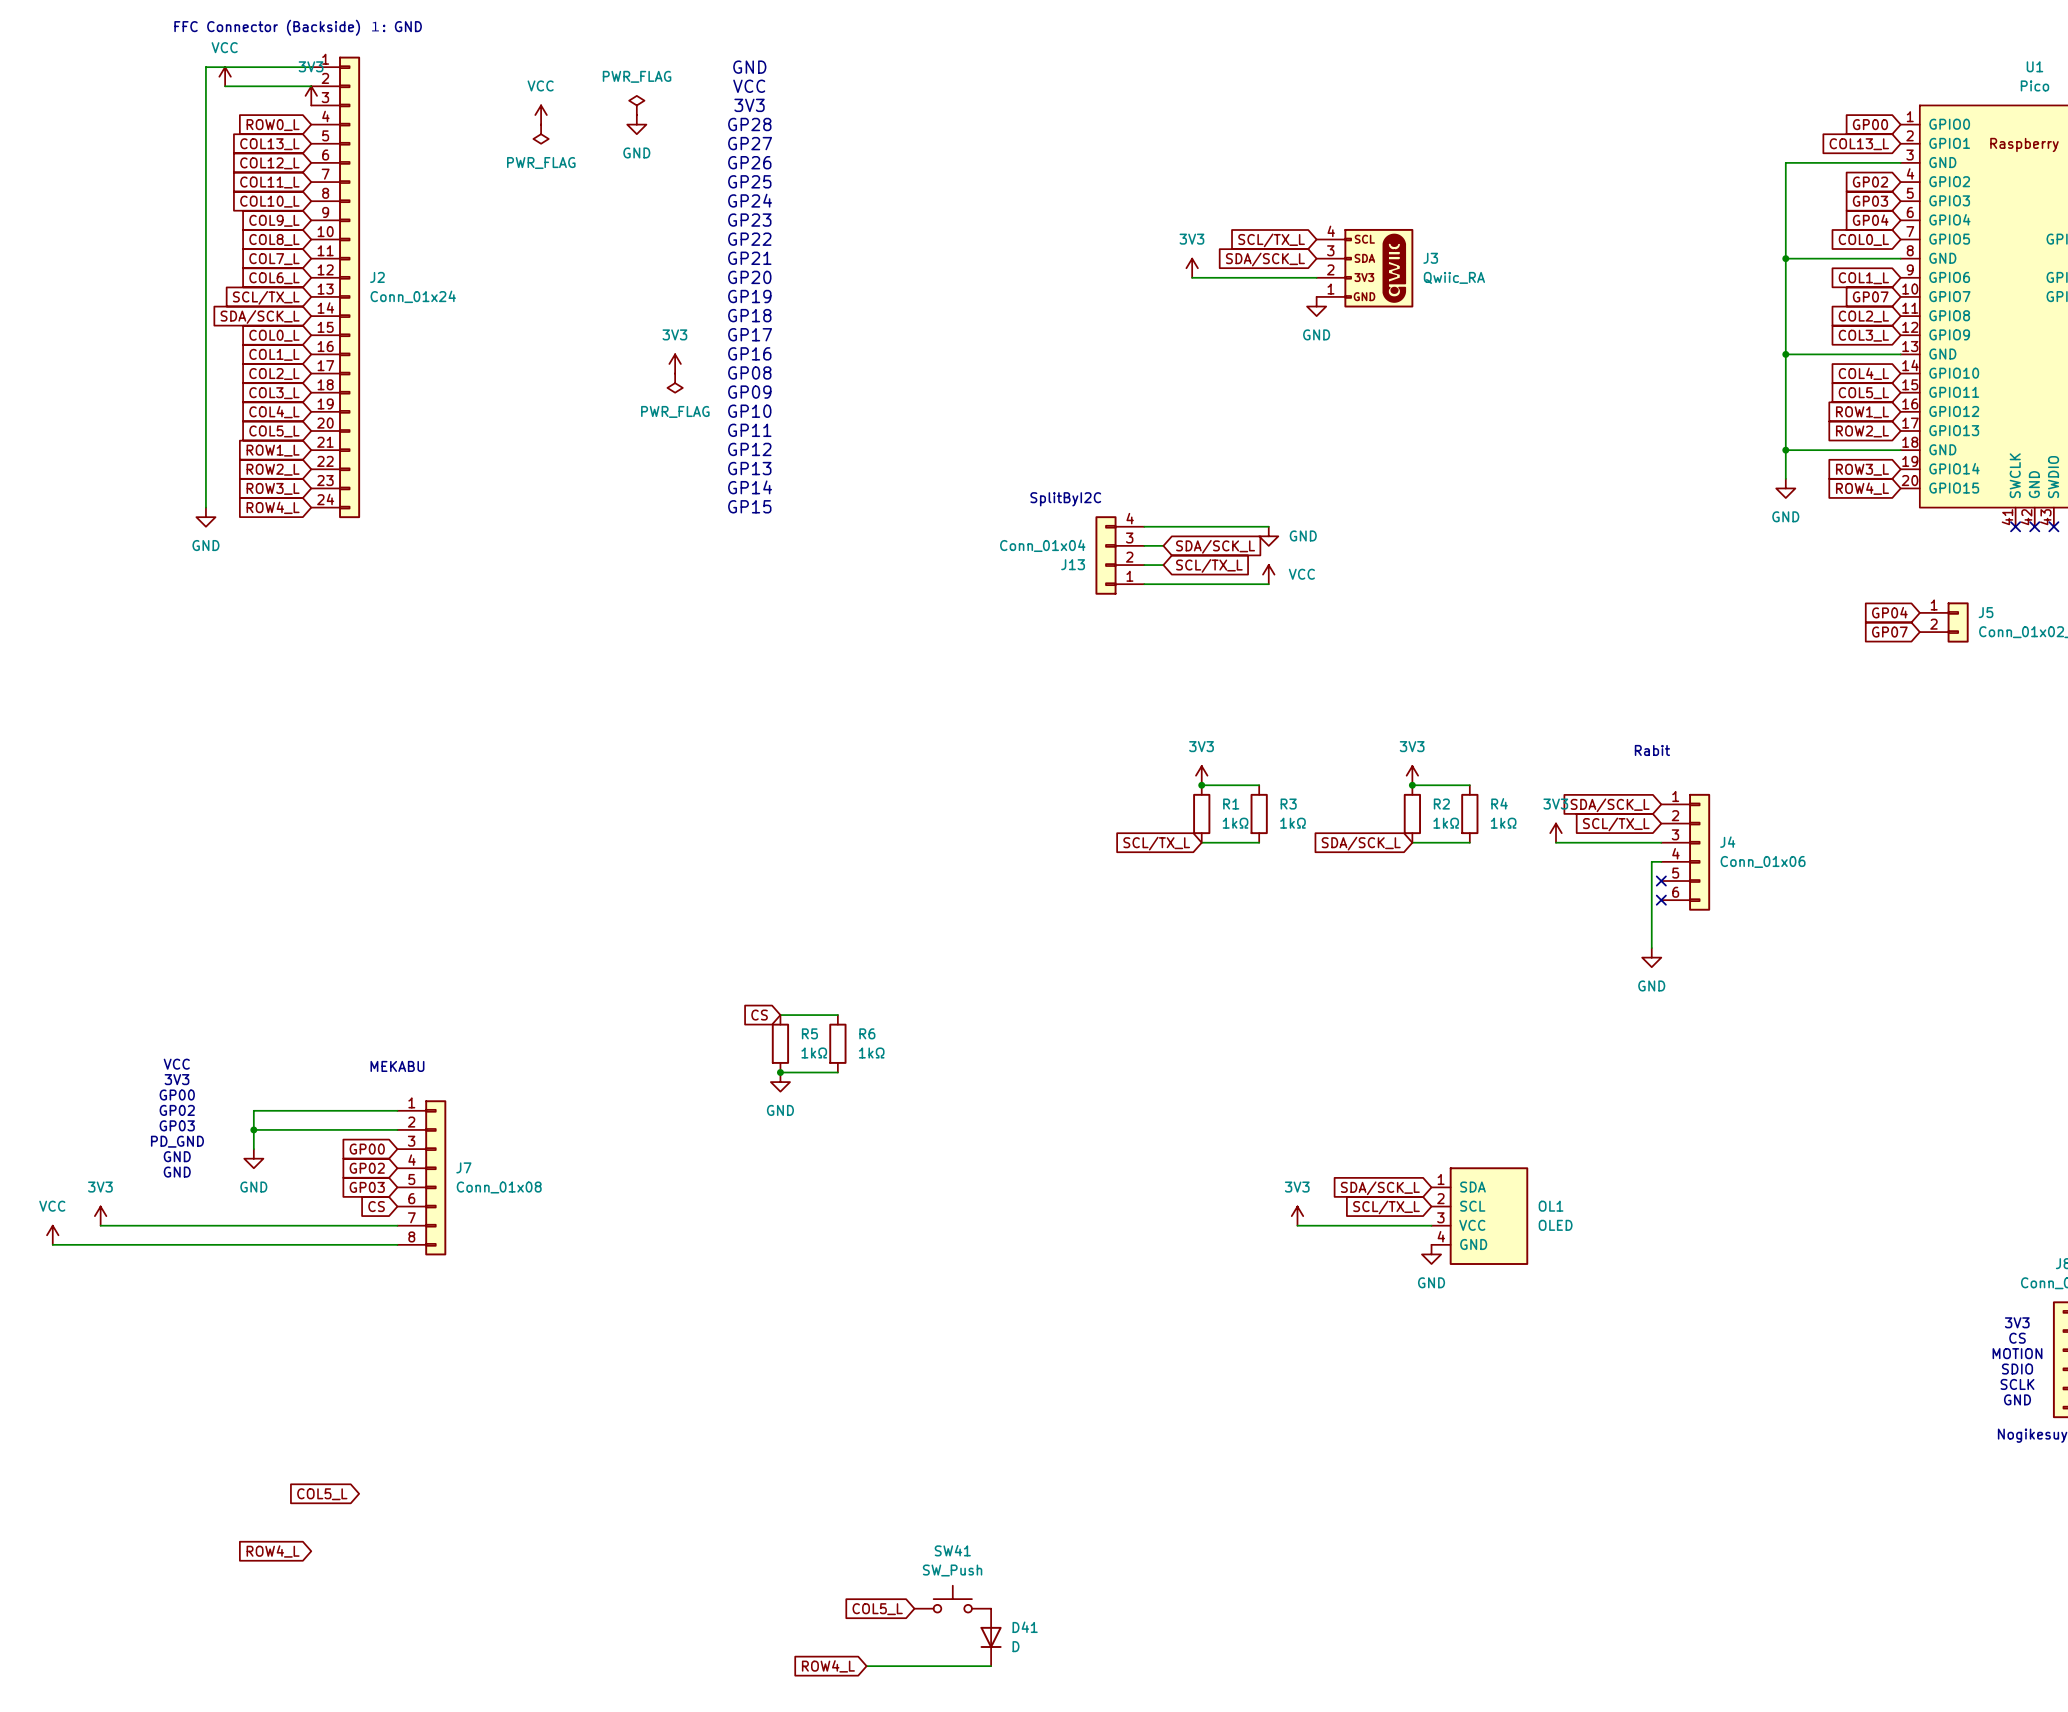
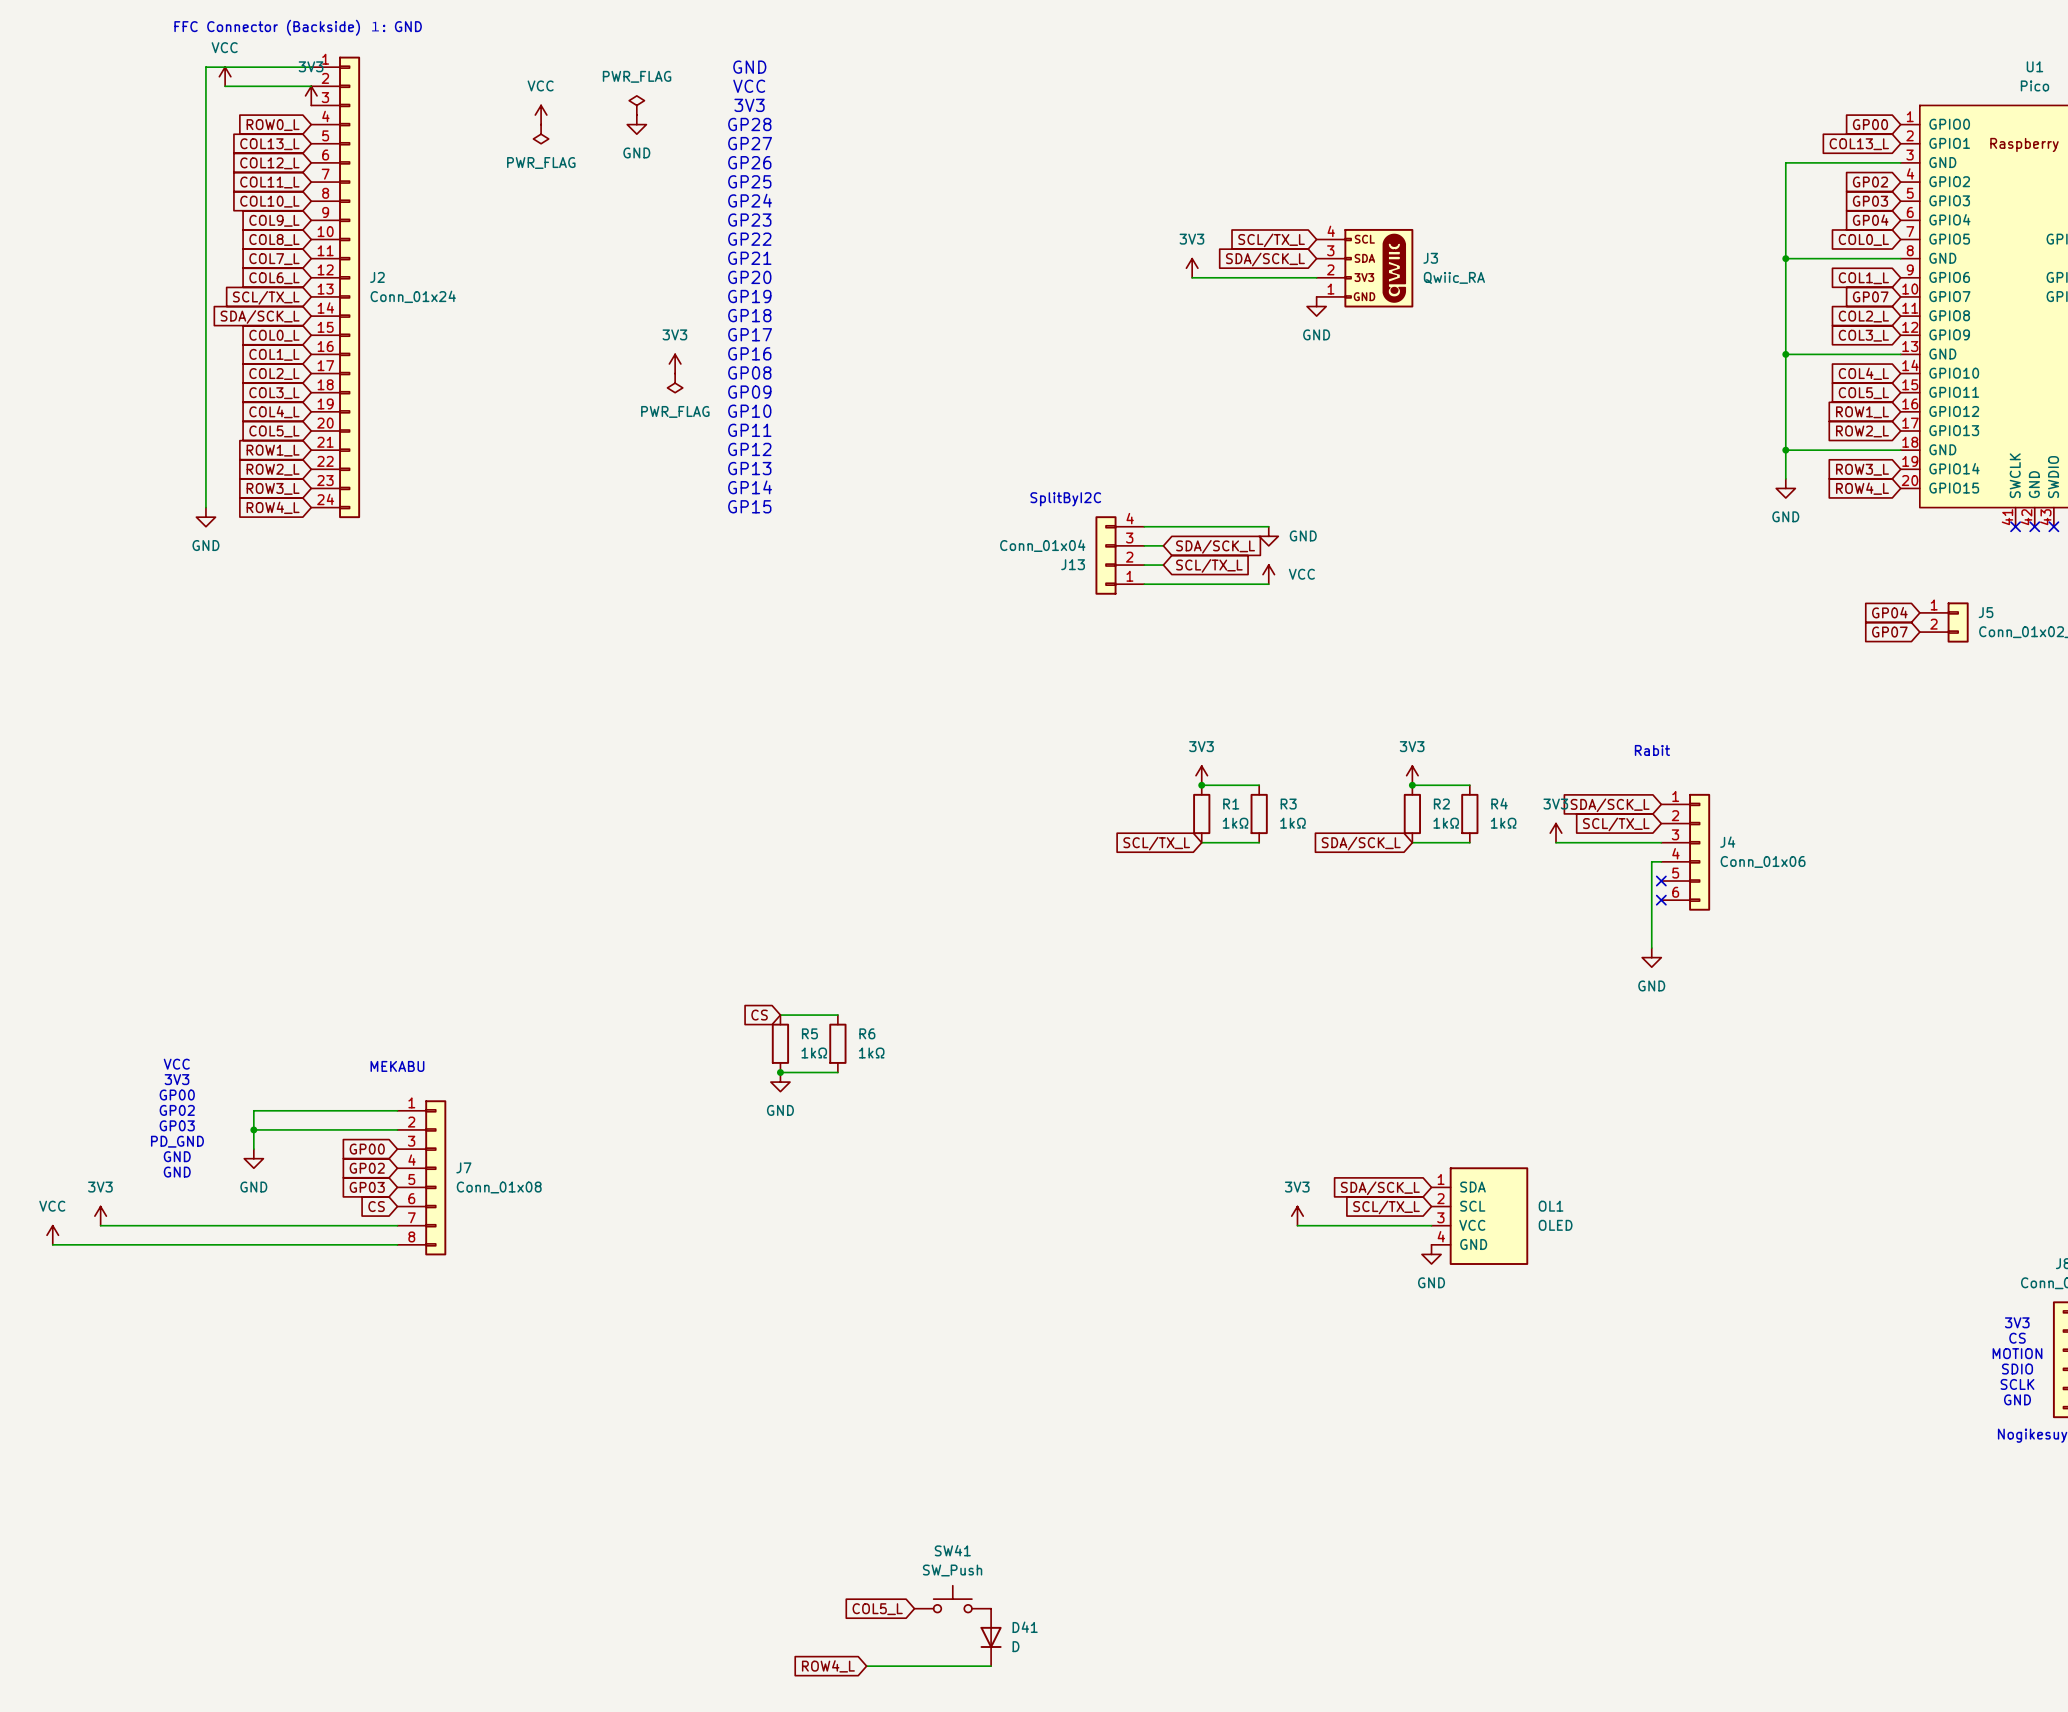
global label: COL5_L (322, 1494) -> none
global label: ROW4_L (273, 1551) -> none

